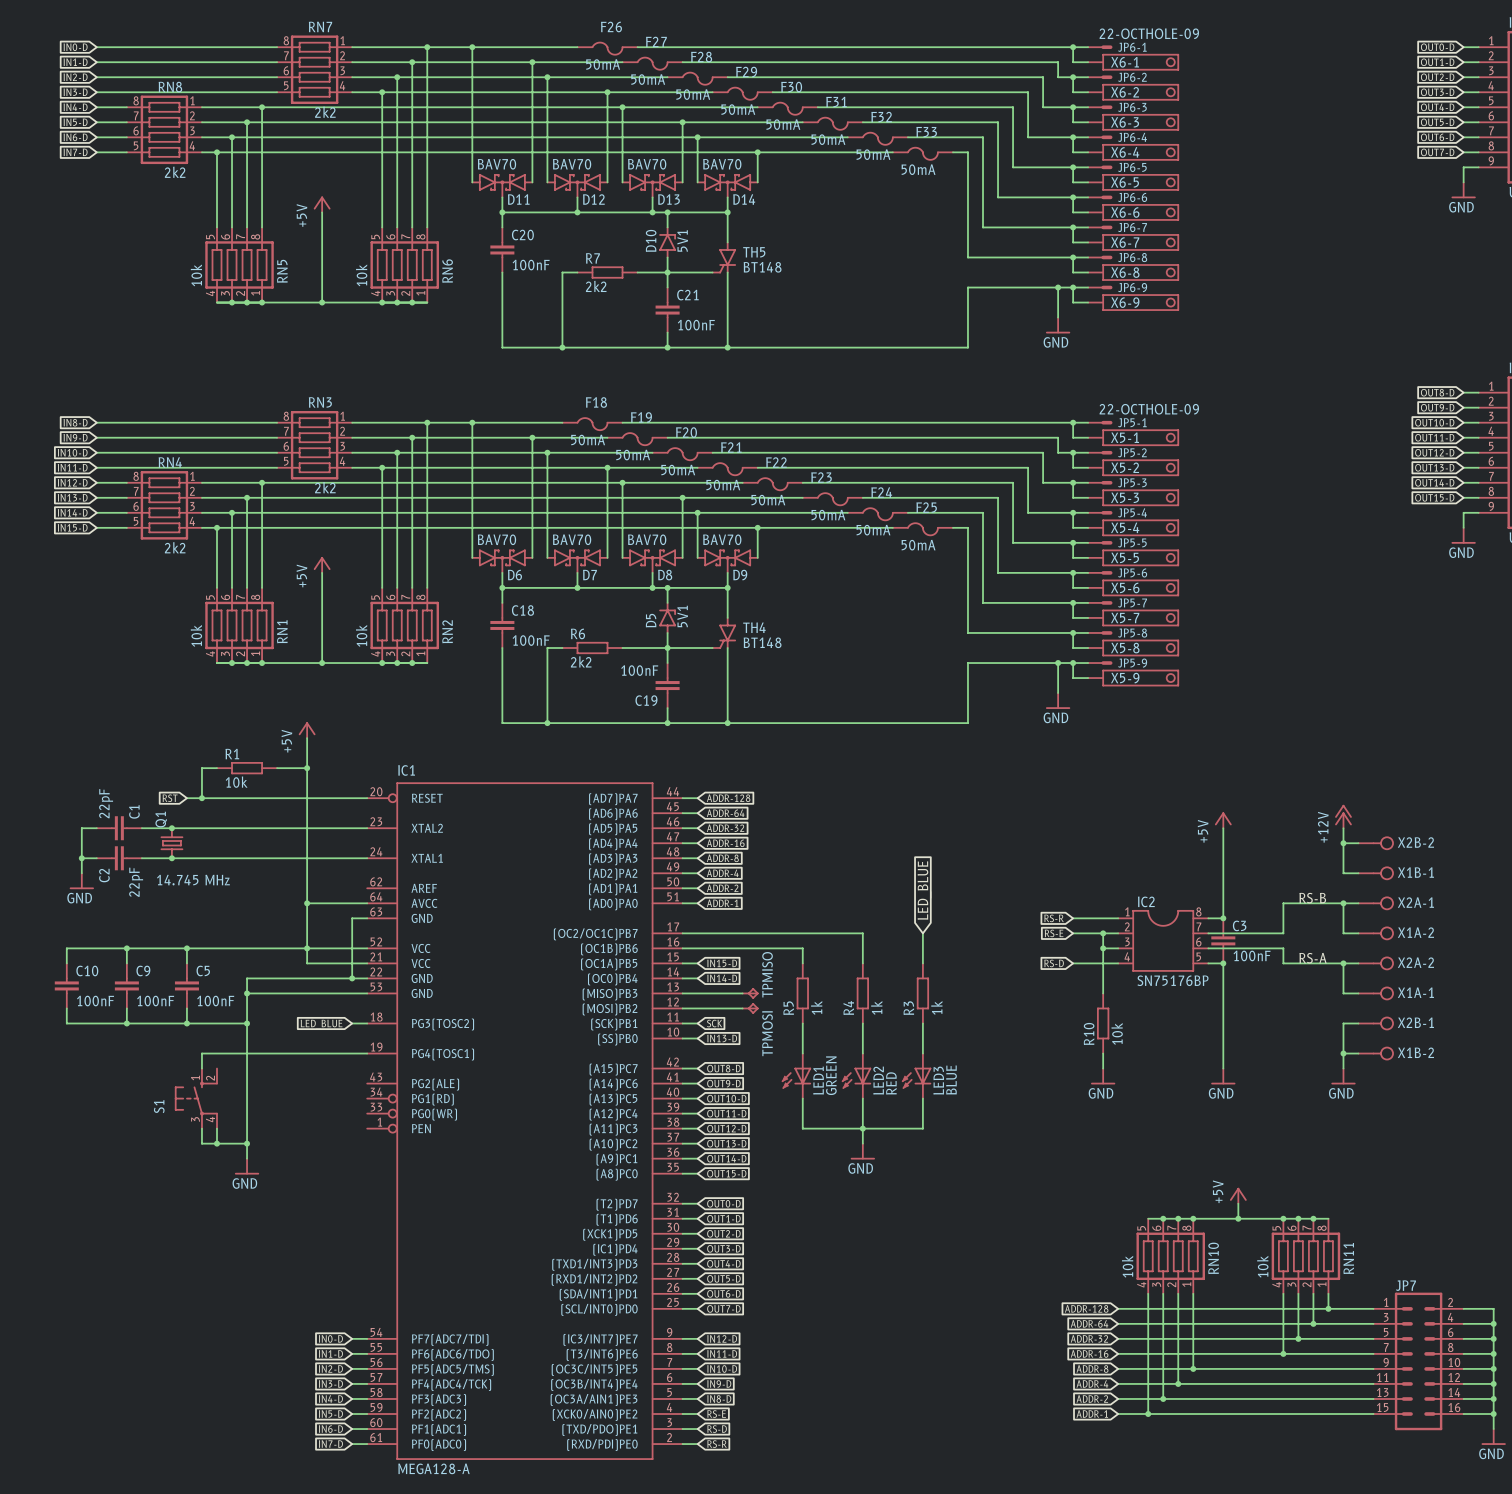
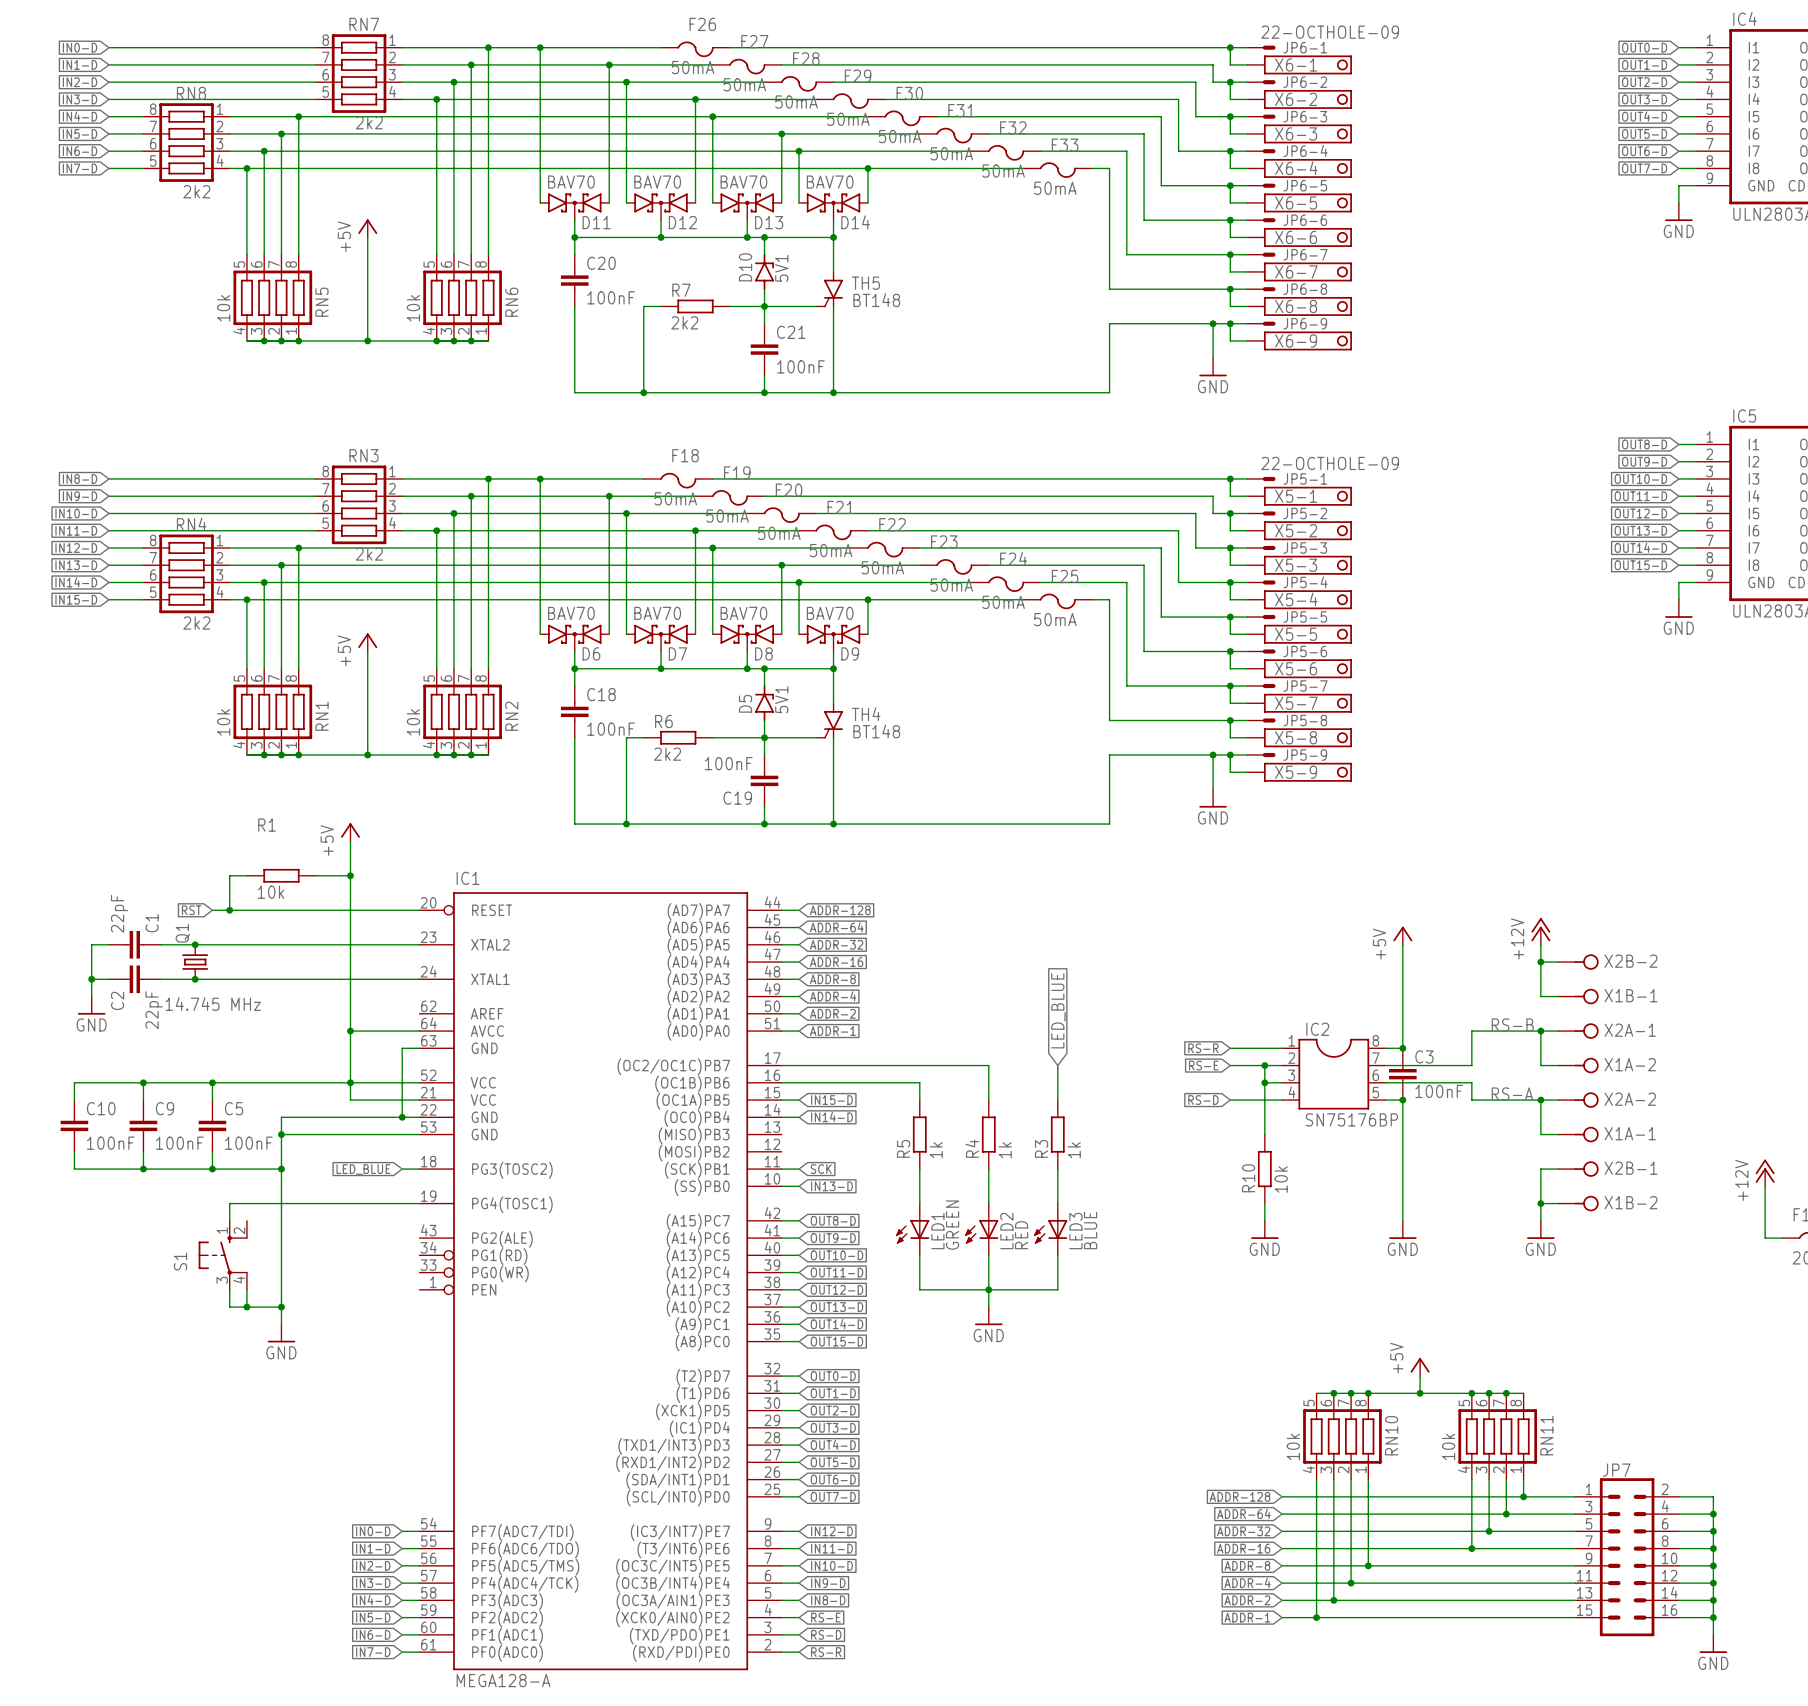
R1 name position: R1 (232, 754) -> R1 (267, 825)
wire: (682, 993) (742, 993) -> none
TPMISO: (750, 993) -> none
wire: (682, 1008) (742, 1008) -> none
TPMOSI: (750, 1008) -> none

